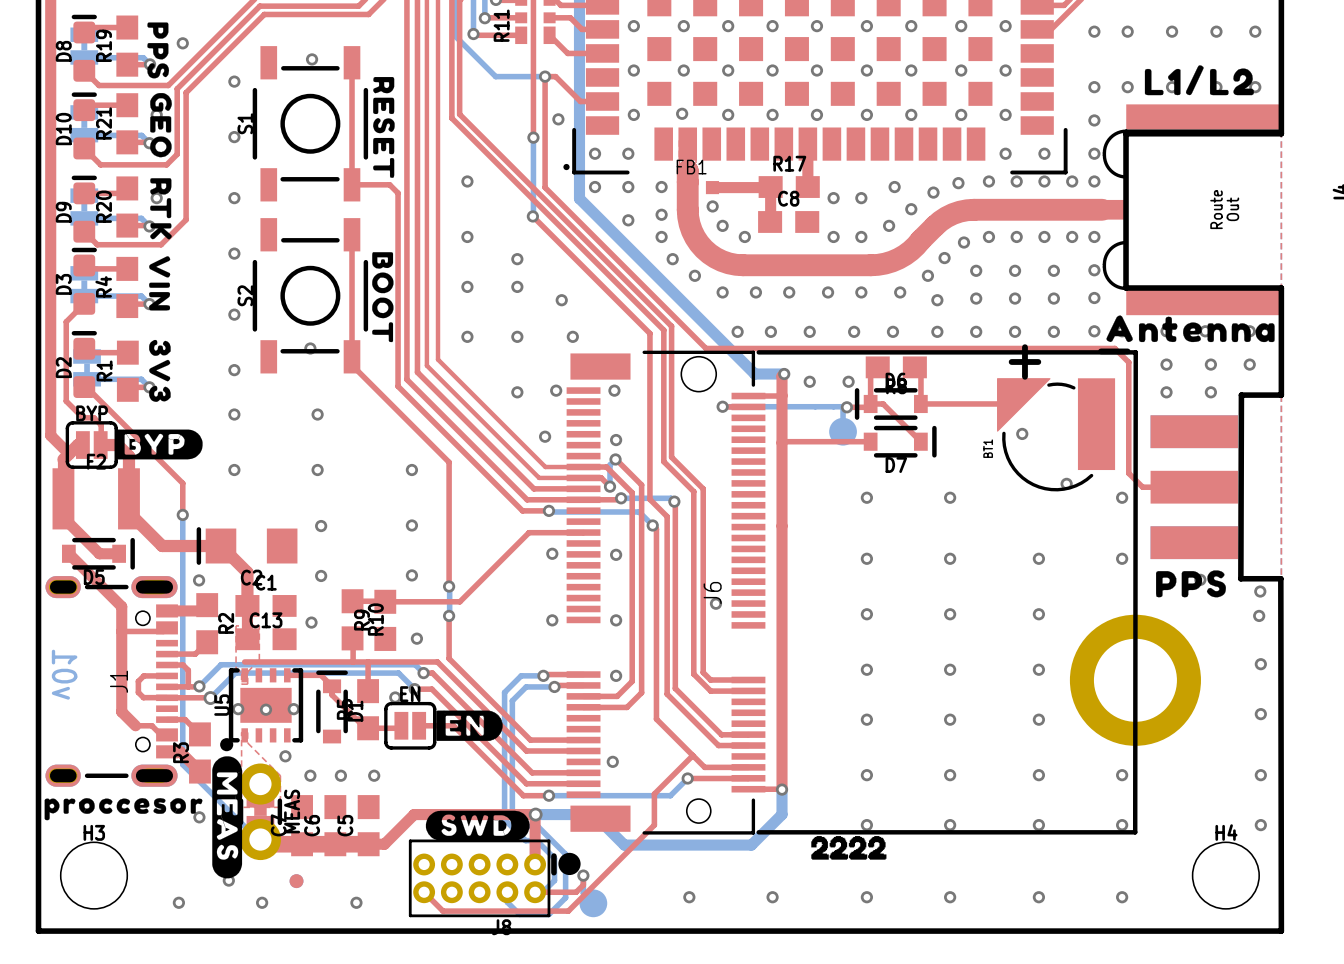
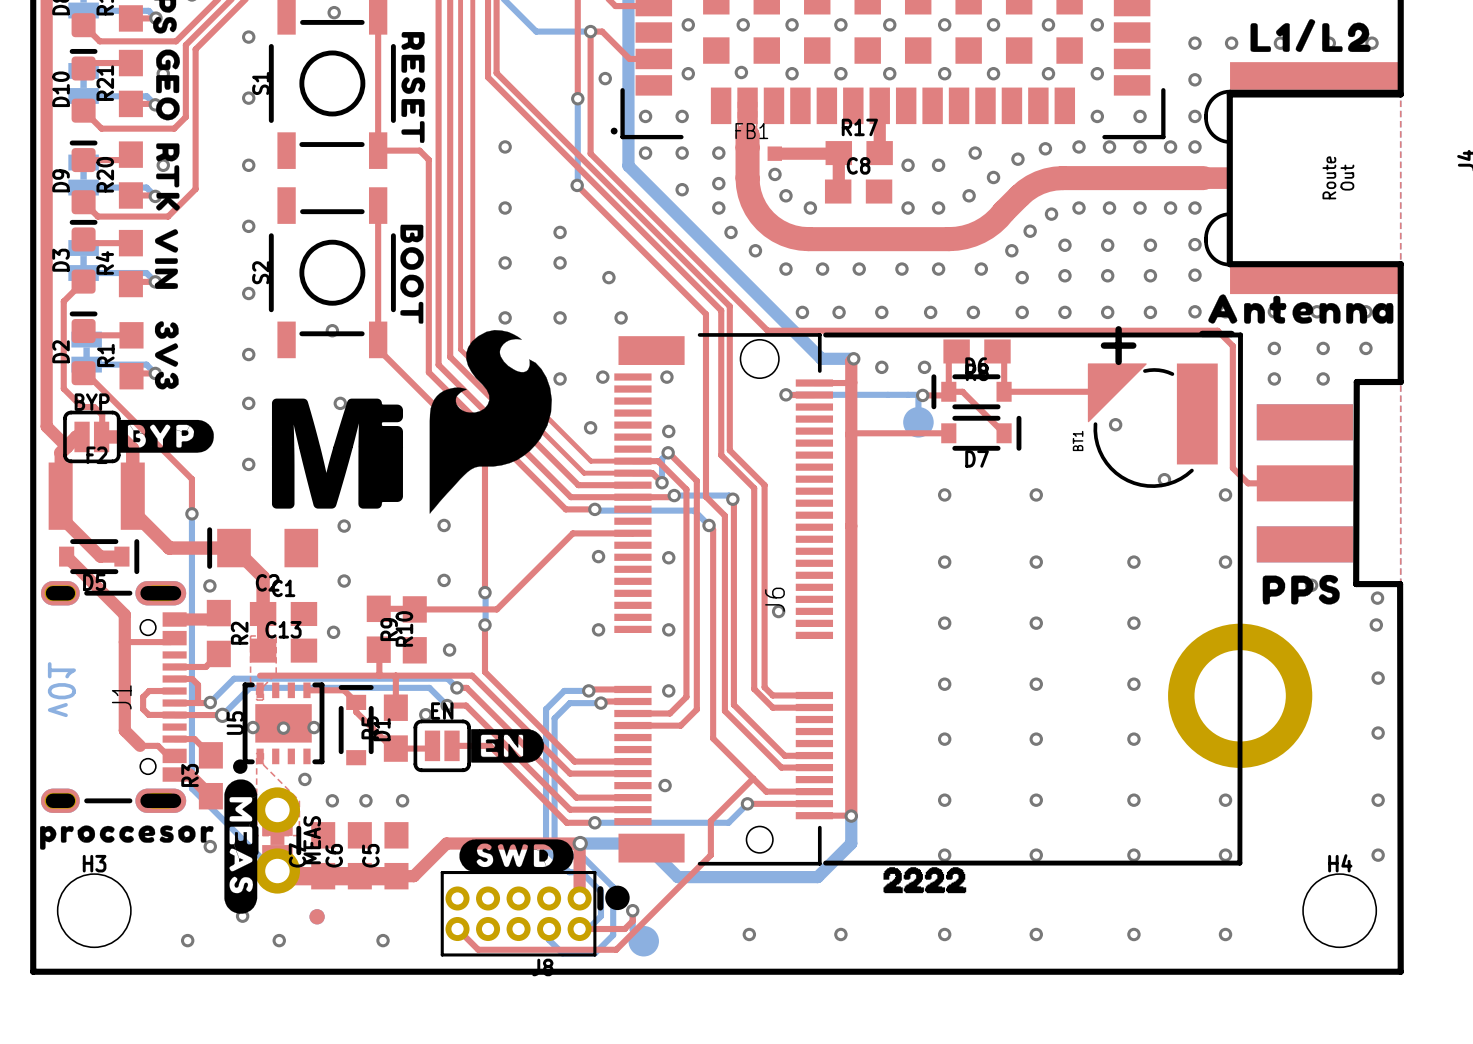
drawing: none -> [271, 330, 552, 514]

